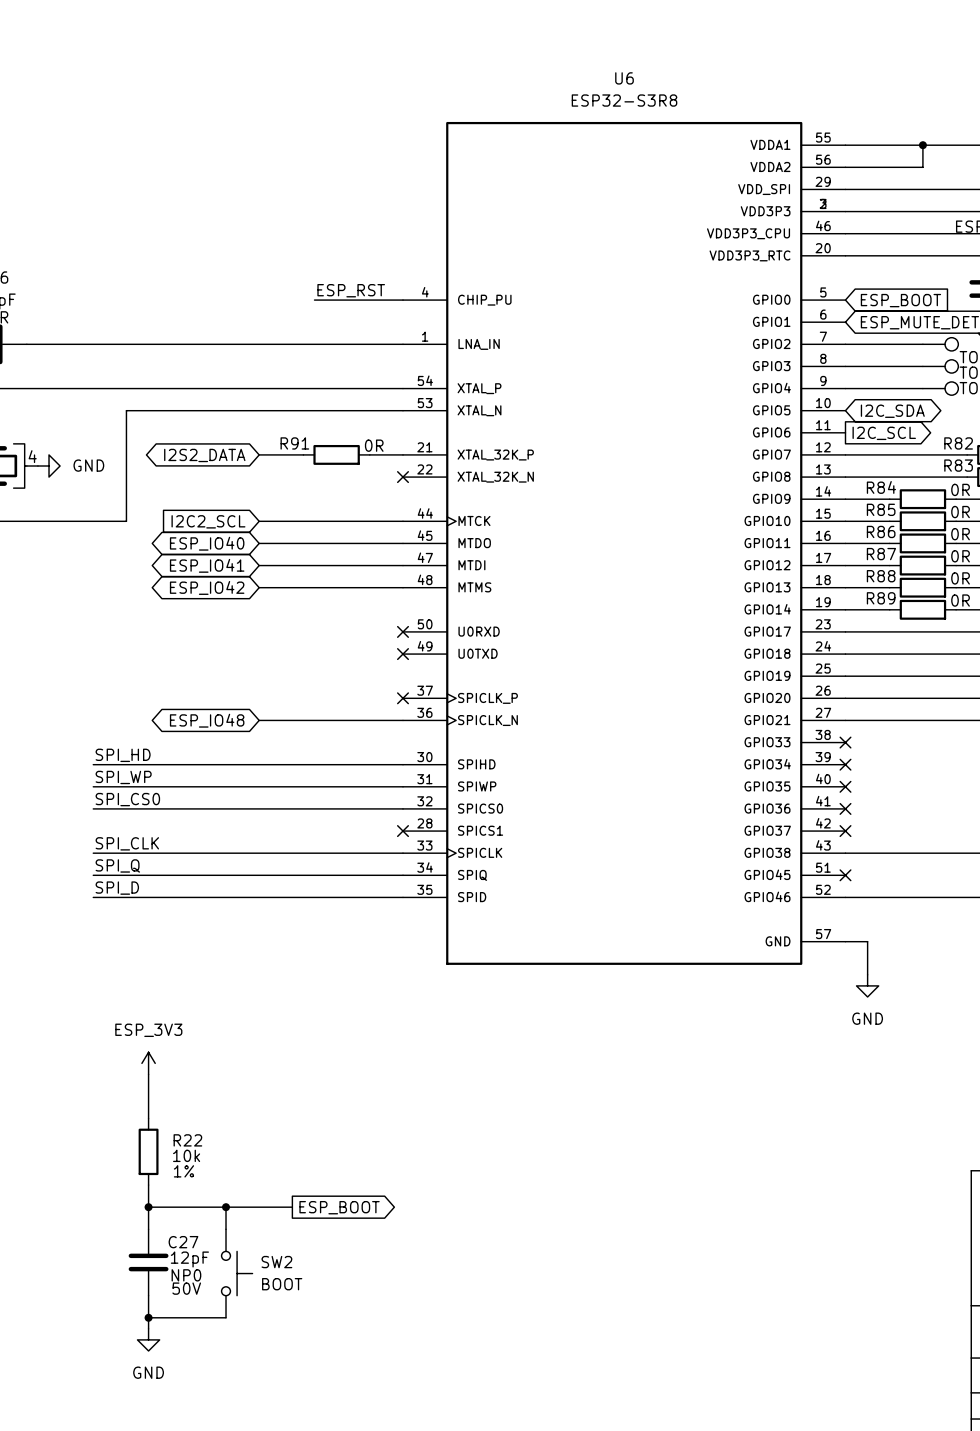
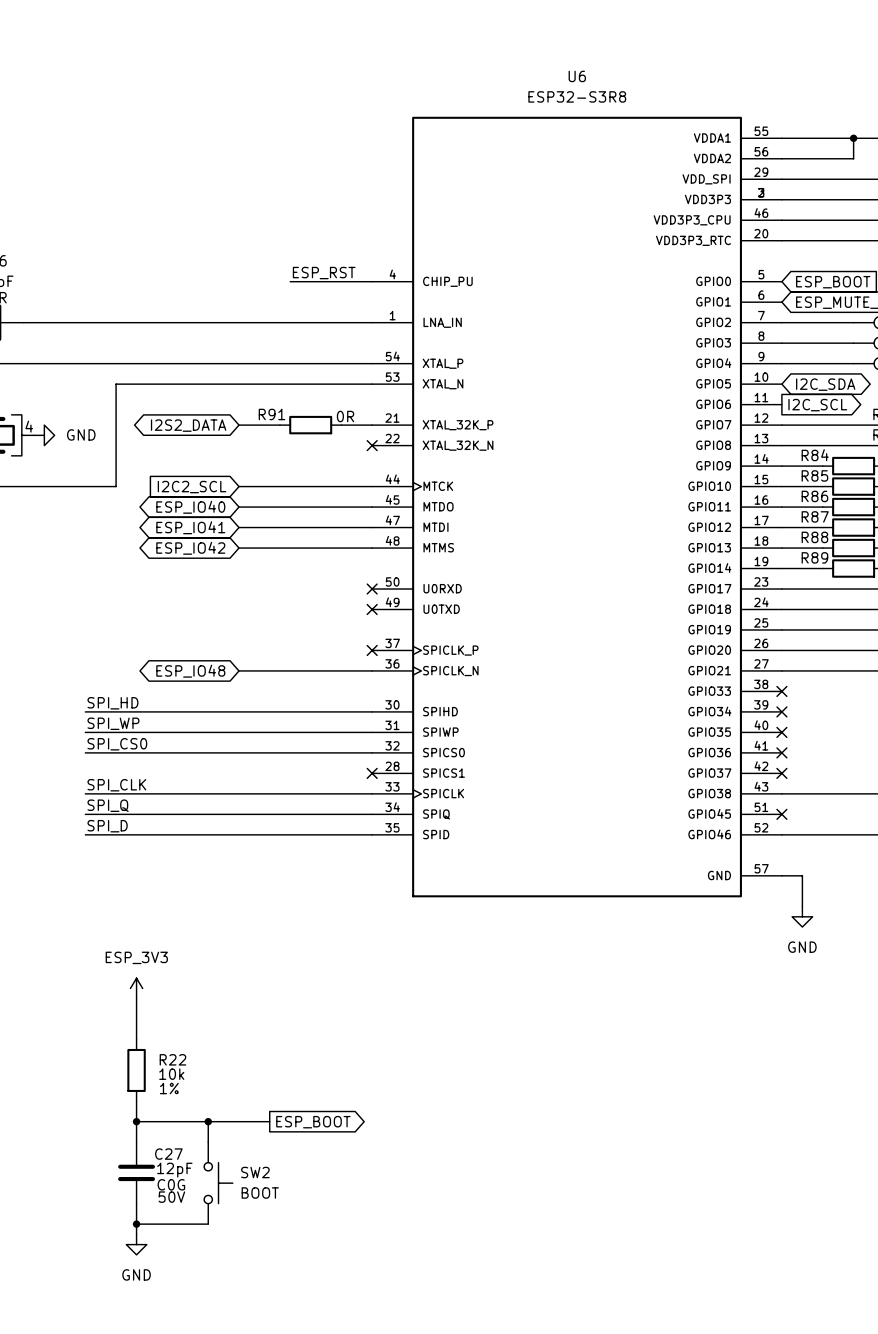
C27 text: NP0 (186, 1275) -> C0G (171, 1184)

